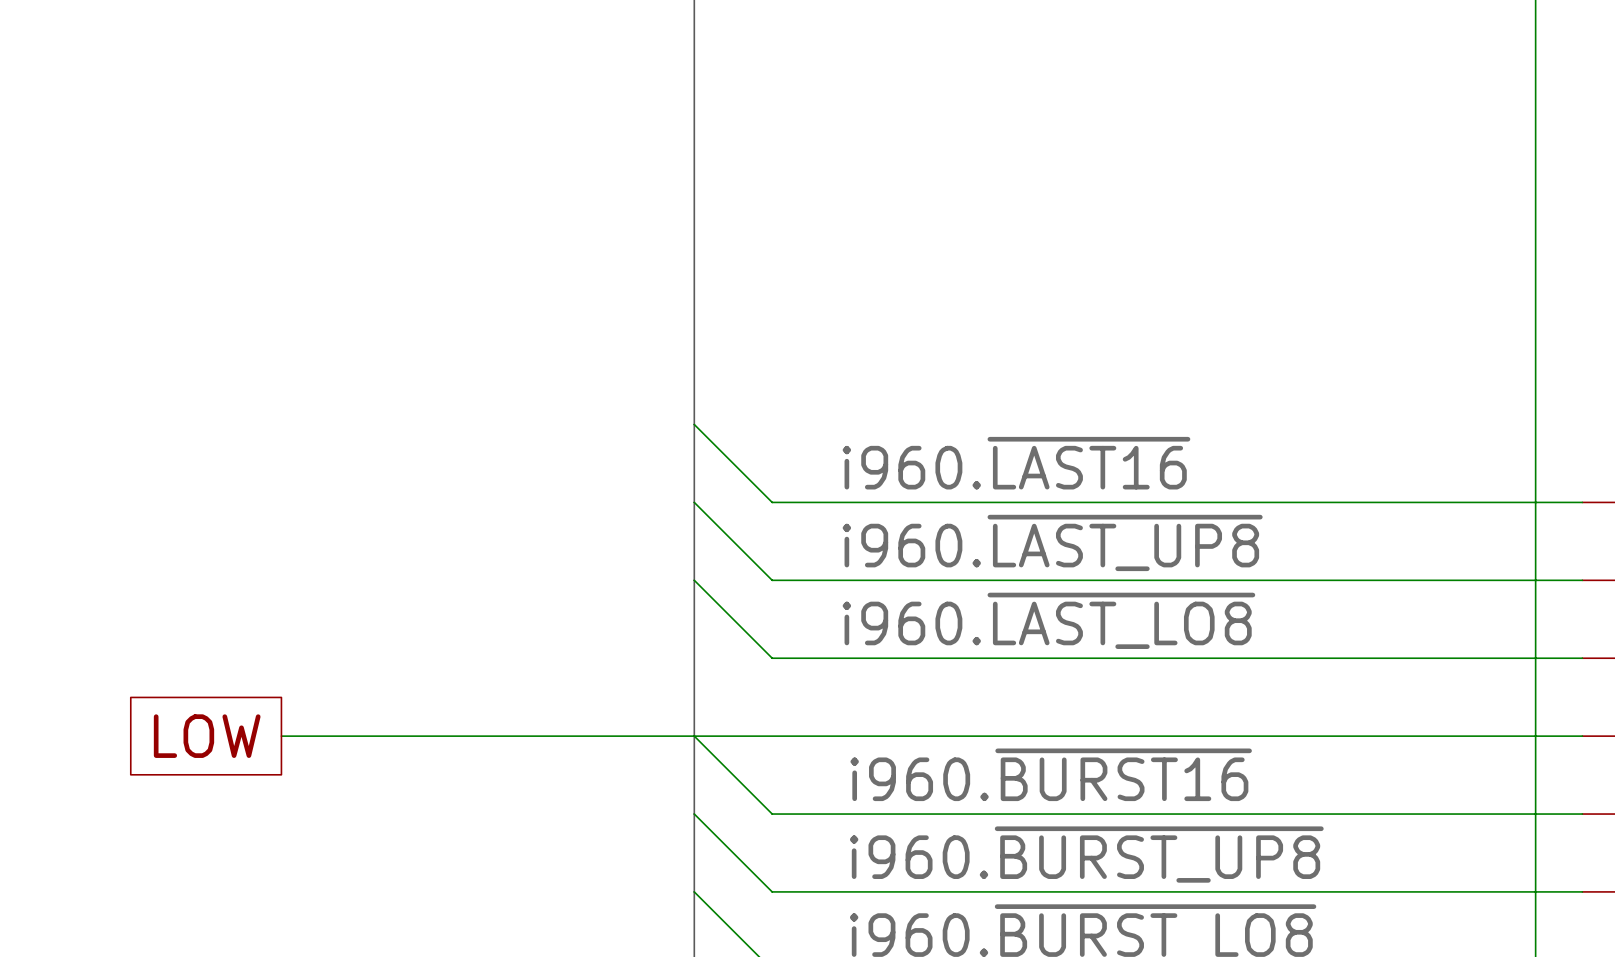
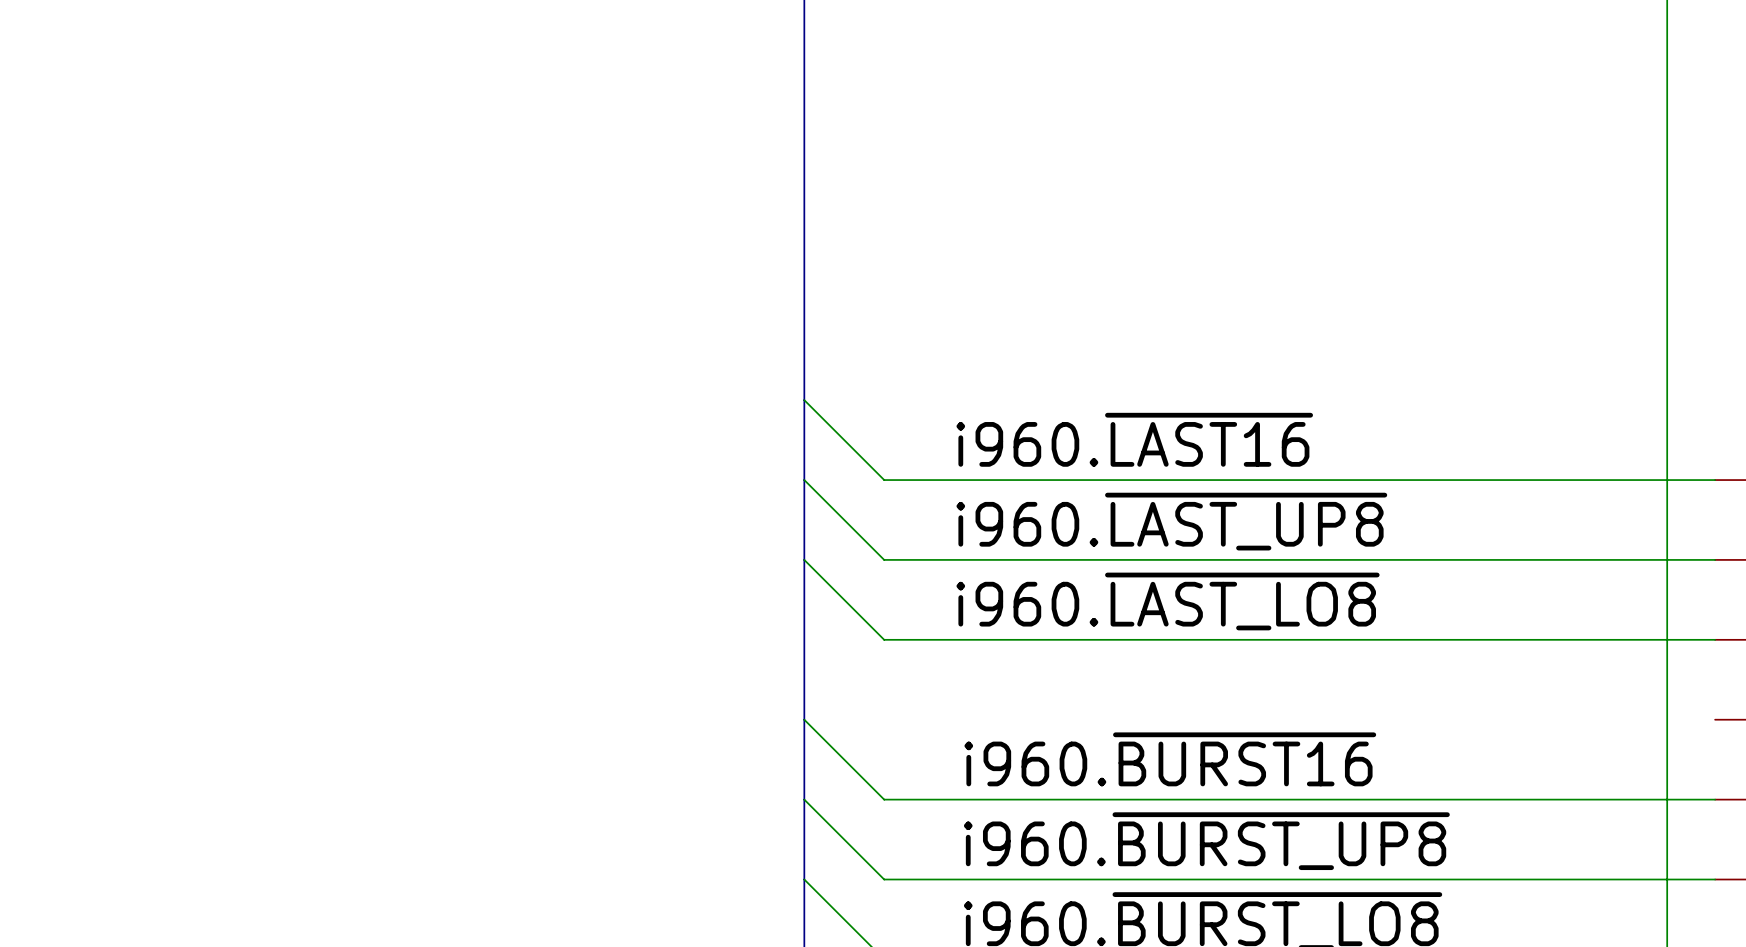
global label: LOW (207, 736) -> none
wire: (281, 736) (1582, 736) -> none

